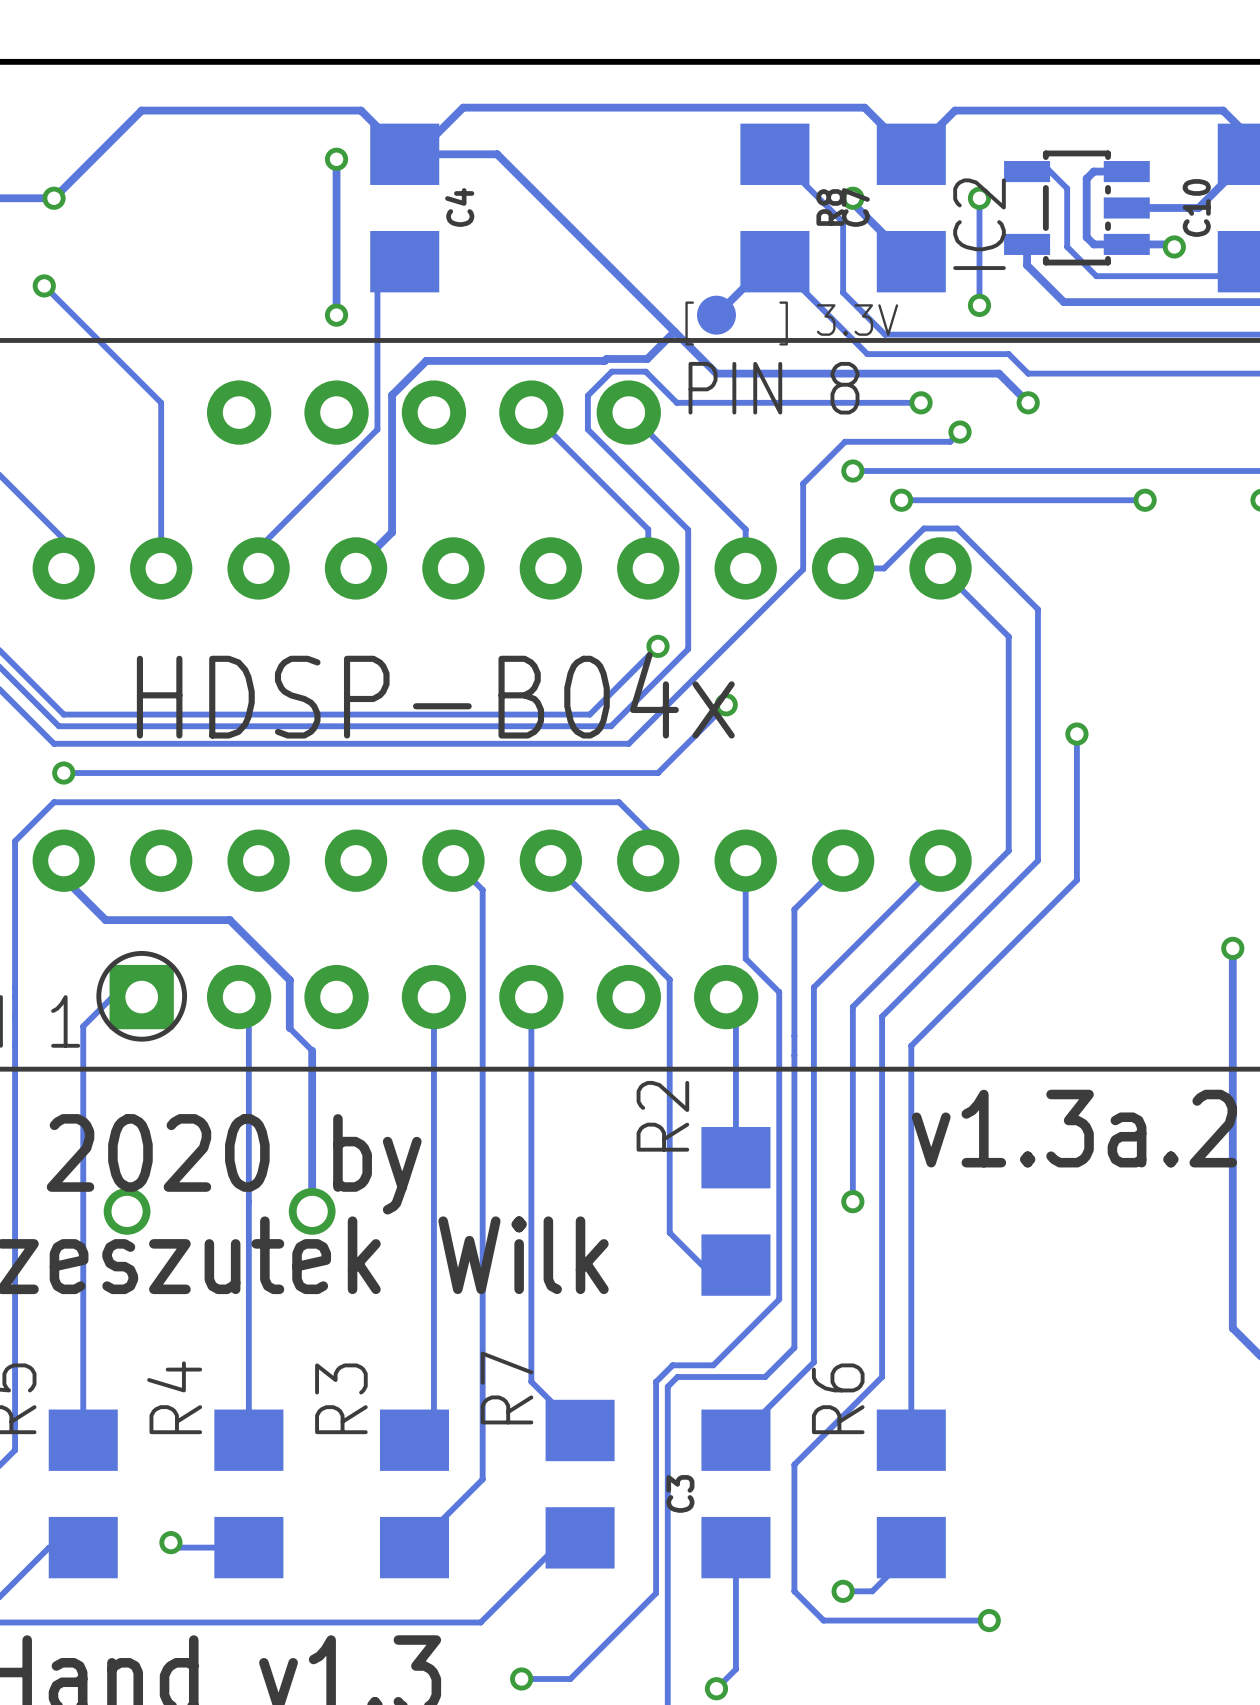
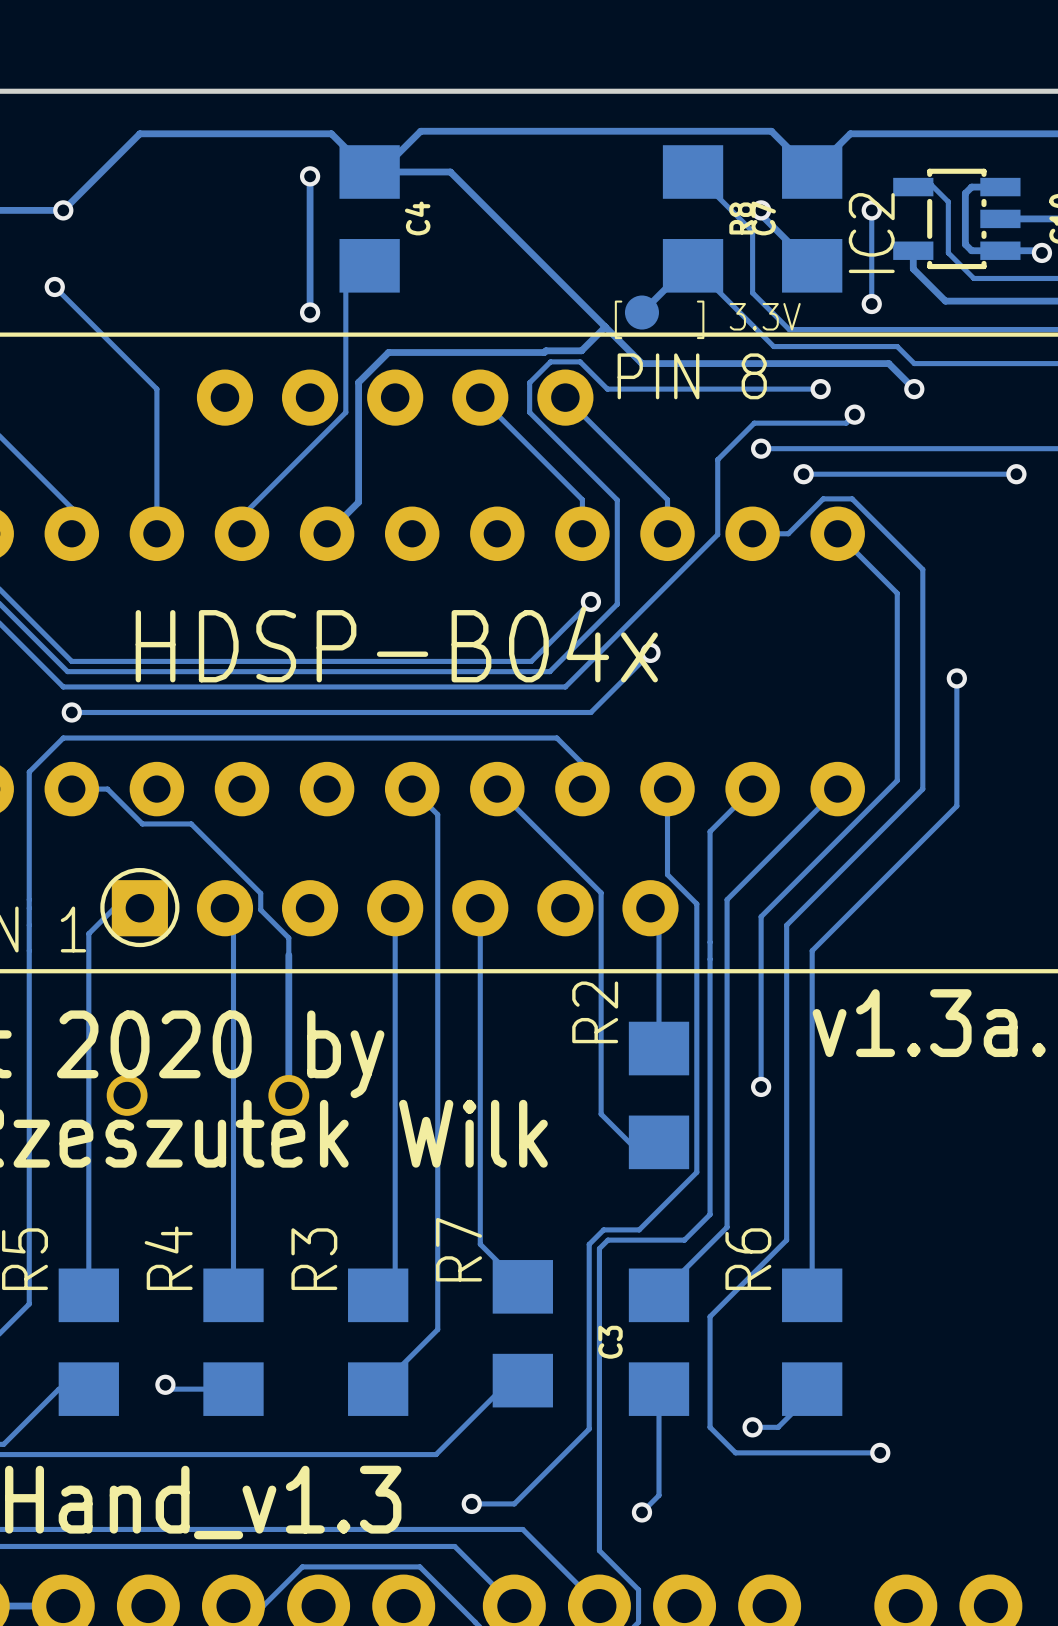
track: (63, 860) (63, 878) (105, 920) (229, 920) (289, 980) (289, 1028) (312, 1050) -> (71, 789) (107, 789) (142, 823) (191, 823) (260, 893) (260, 909) (288, 938) (288, 955)

